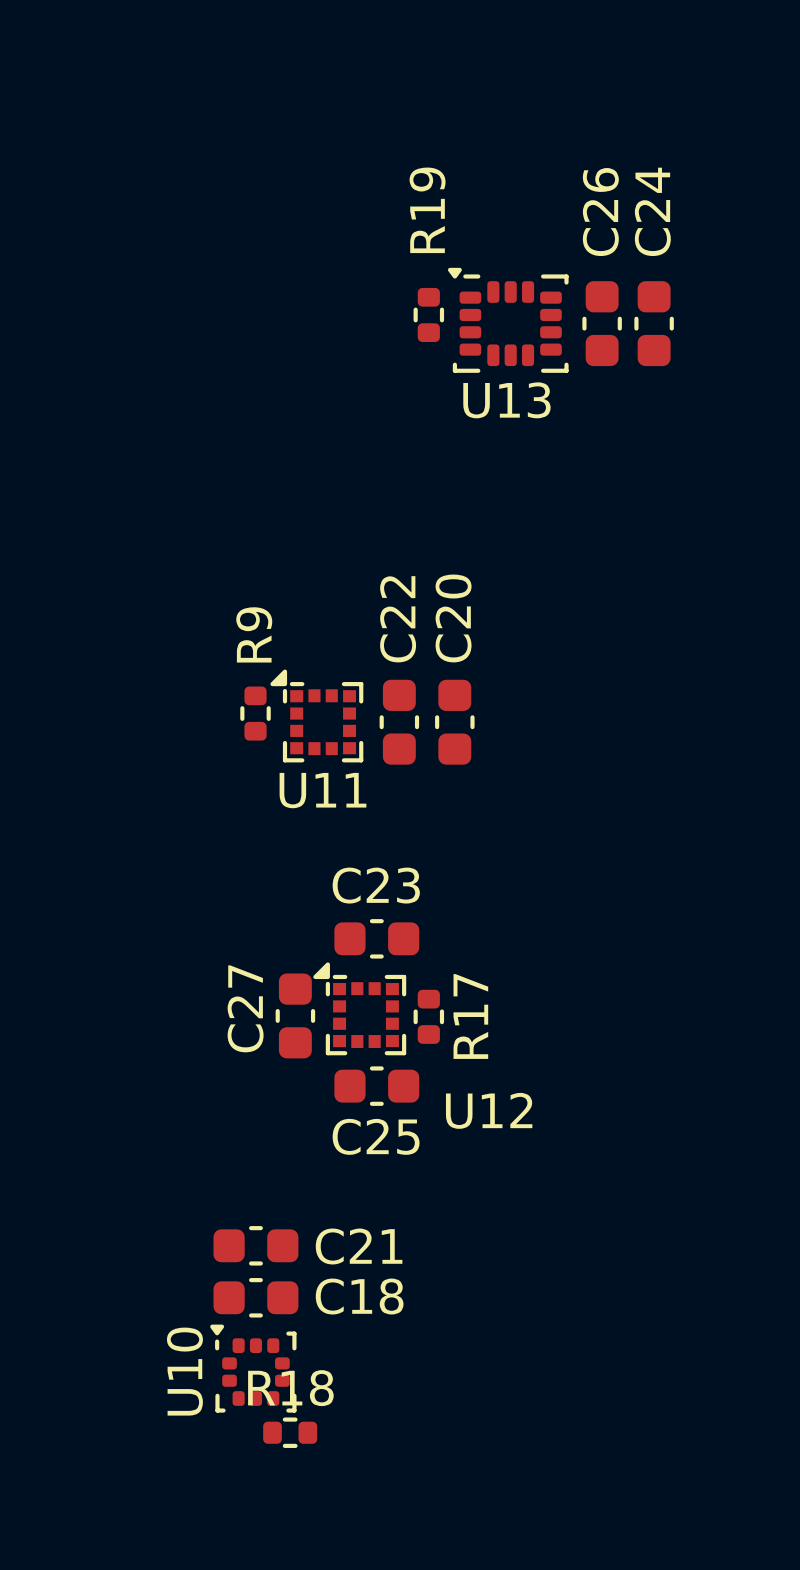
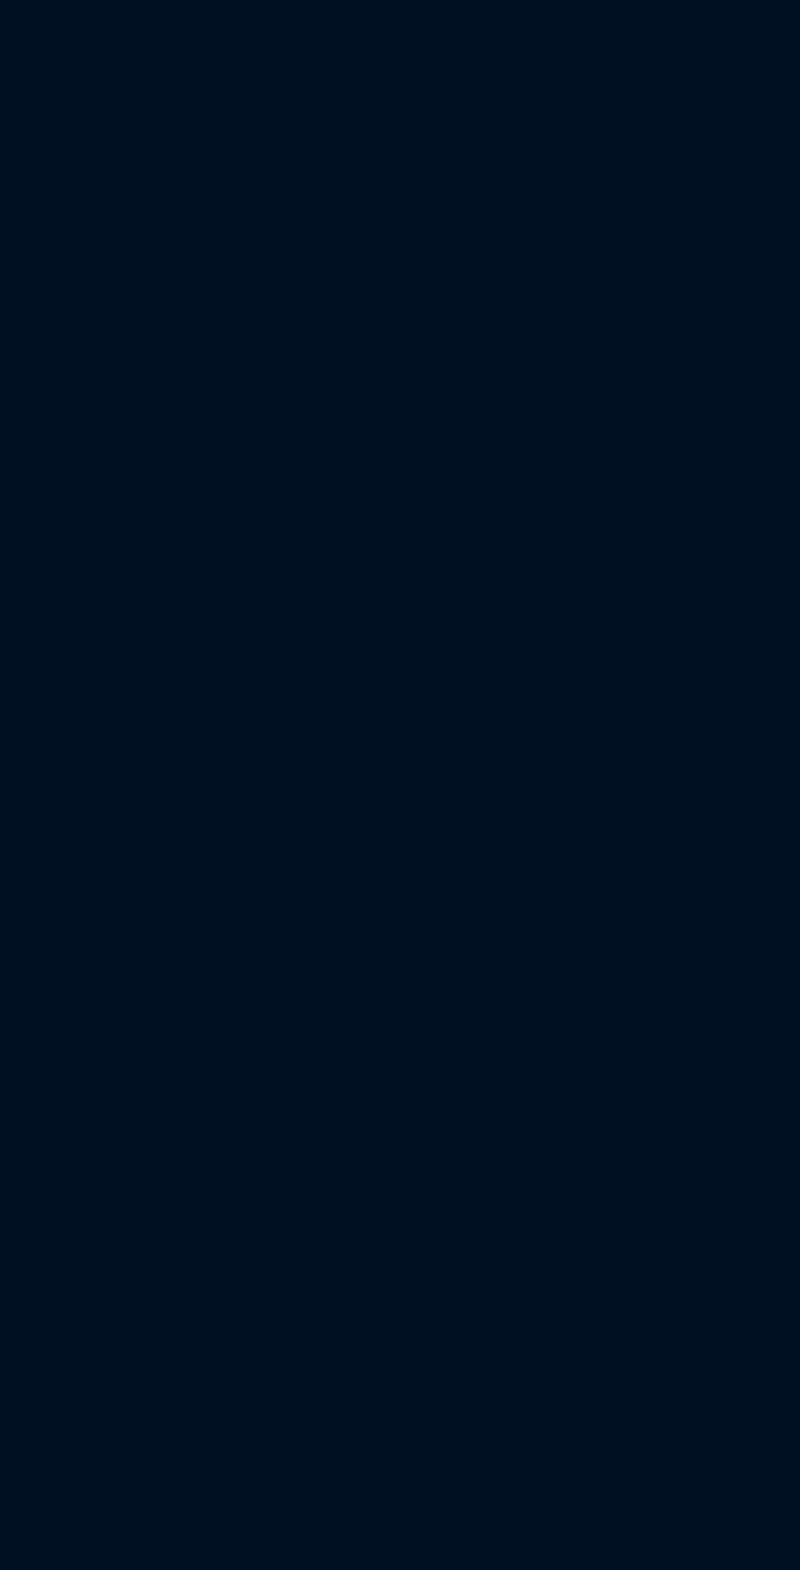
R19: (428, 314) -> none
U13: (508, 320) -> none
C26: (602, 323) -> none
C24: (654, 323) -> none
R9: (255, 713) -> none
U11: (316, 715) -> none
C22: (399, 722) -> none
C20: (454, 722) -> none
C23: (376, 938) -> none
U12: (359, 1008) -> none
C27: (295, 1015) -> none
R17: (428, 1016) -> none
C25: (376, 1086) -> none
C21: (255, 1245) -> none
C18: (255, 1297) -> none
U10: (253, 1368) -> none
R18: (290, 1432) -> none

